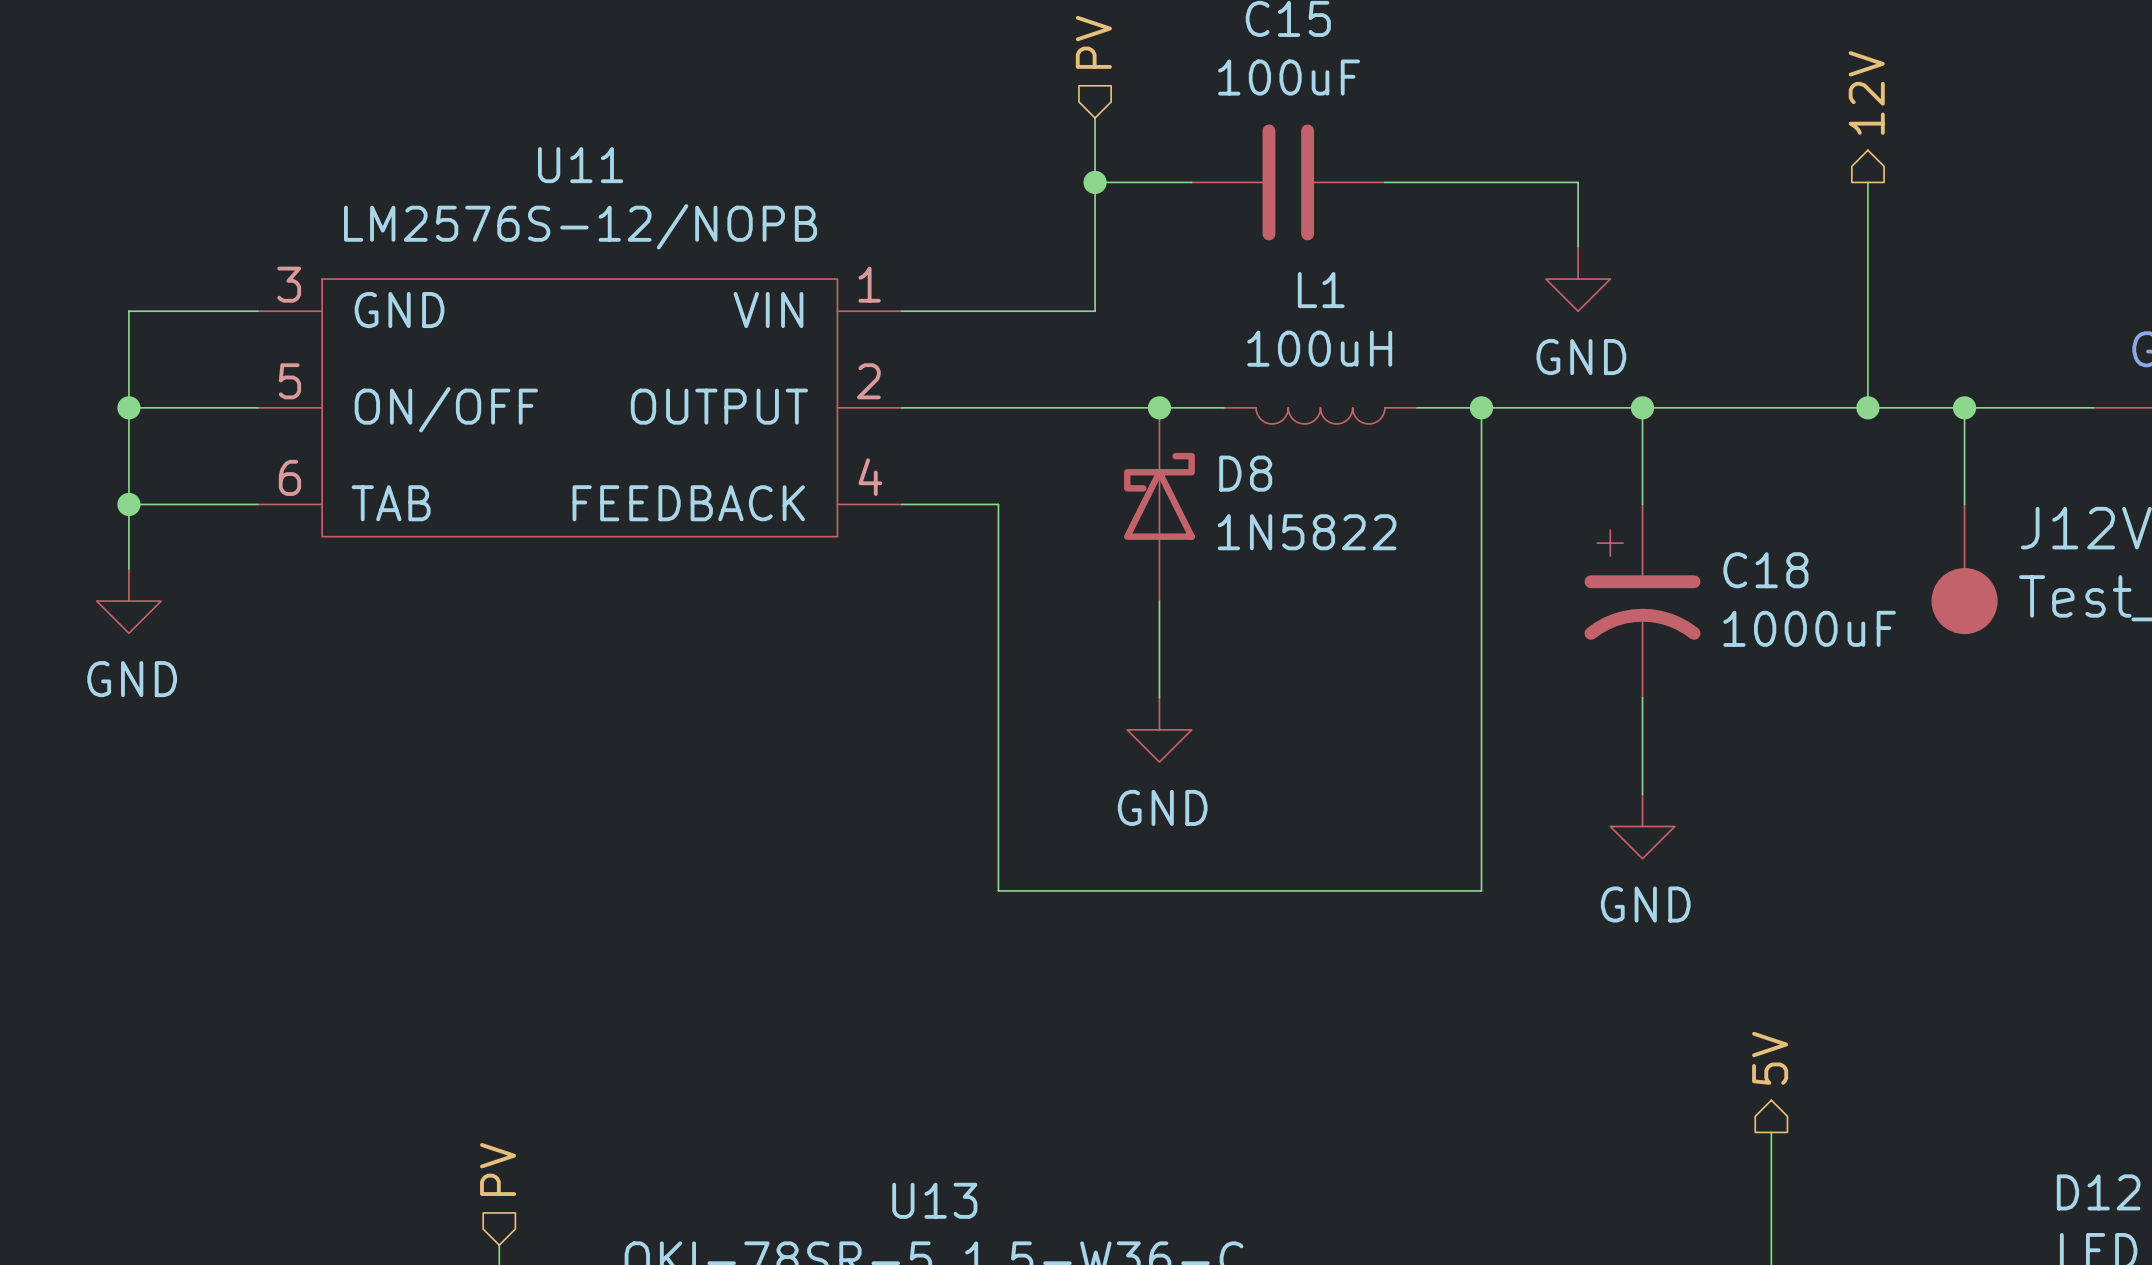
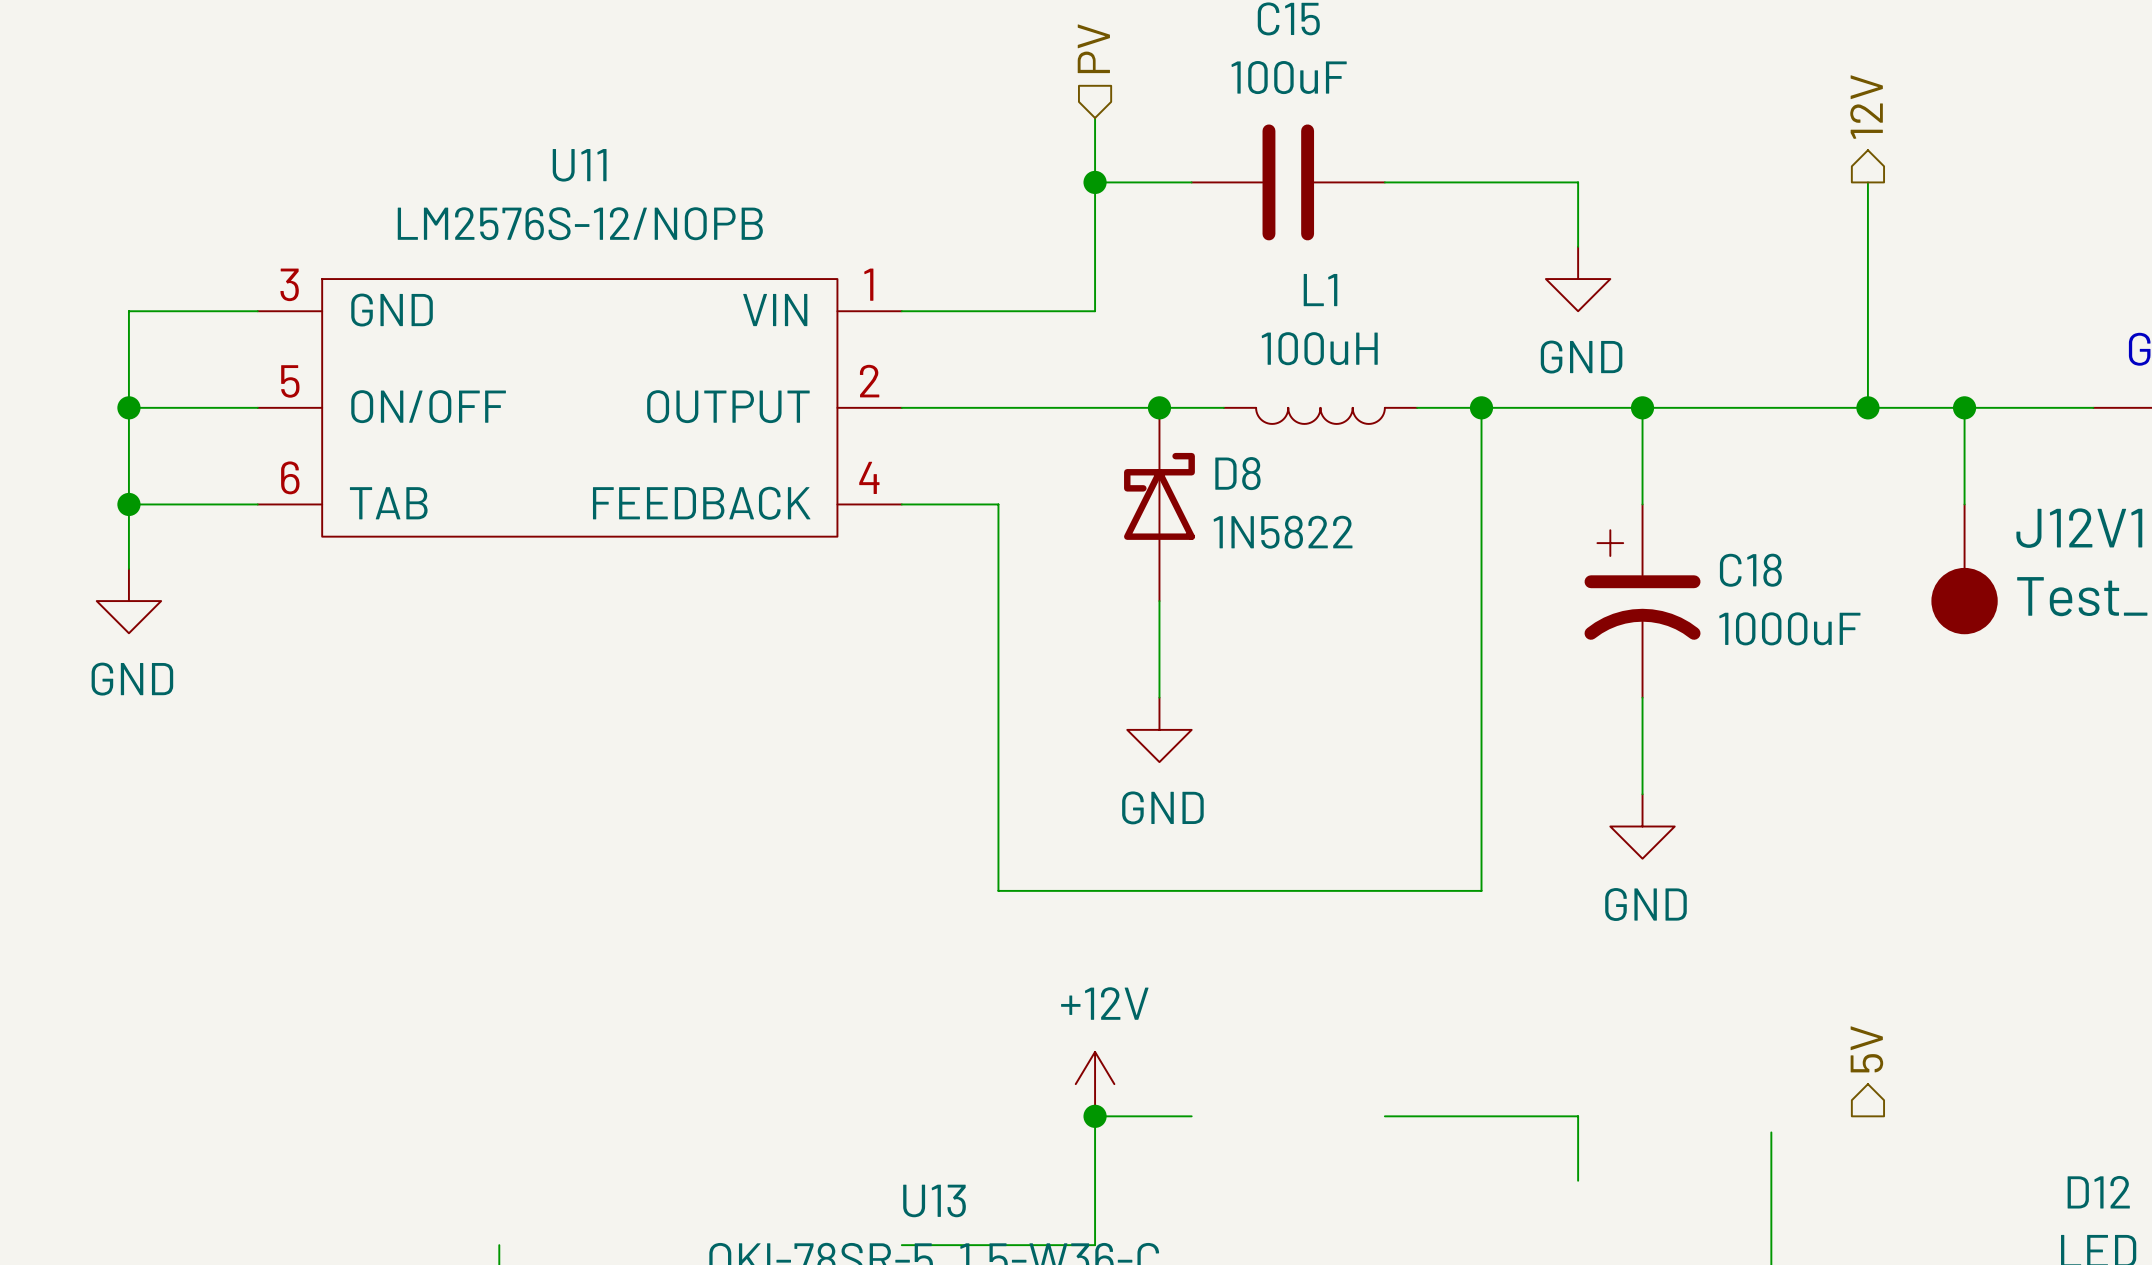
hierarchical label position: 5V (1770, 1058) -> 5V (1866, 1049)
power symbol: none -> +12V (1095, 1084)
junction: none -> (1095, 1116)
wire: none -> (1191, 1116) (1095, 1116) (1095, 1245) (901, 1245)
wire: none -> (1384, 1116) (1578, 1116) (1578, 1180)
hierarchical label: PV (498, 1169) -> none

